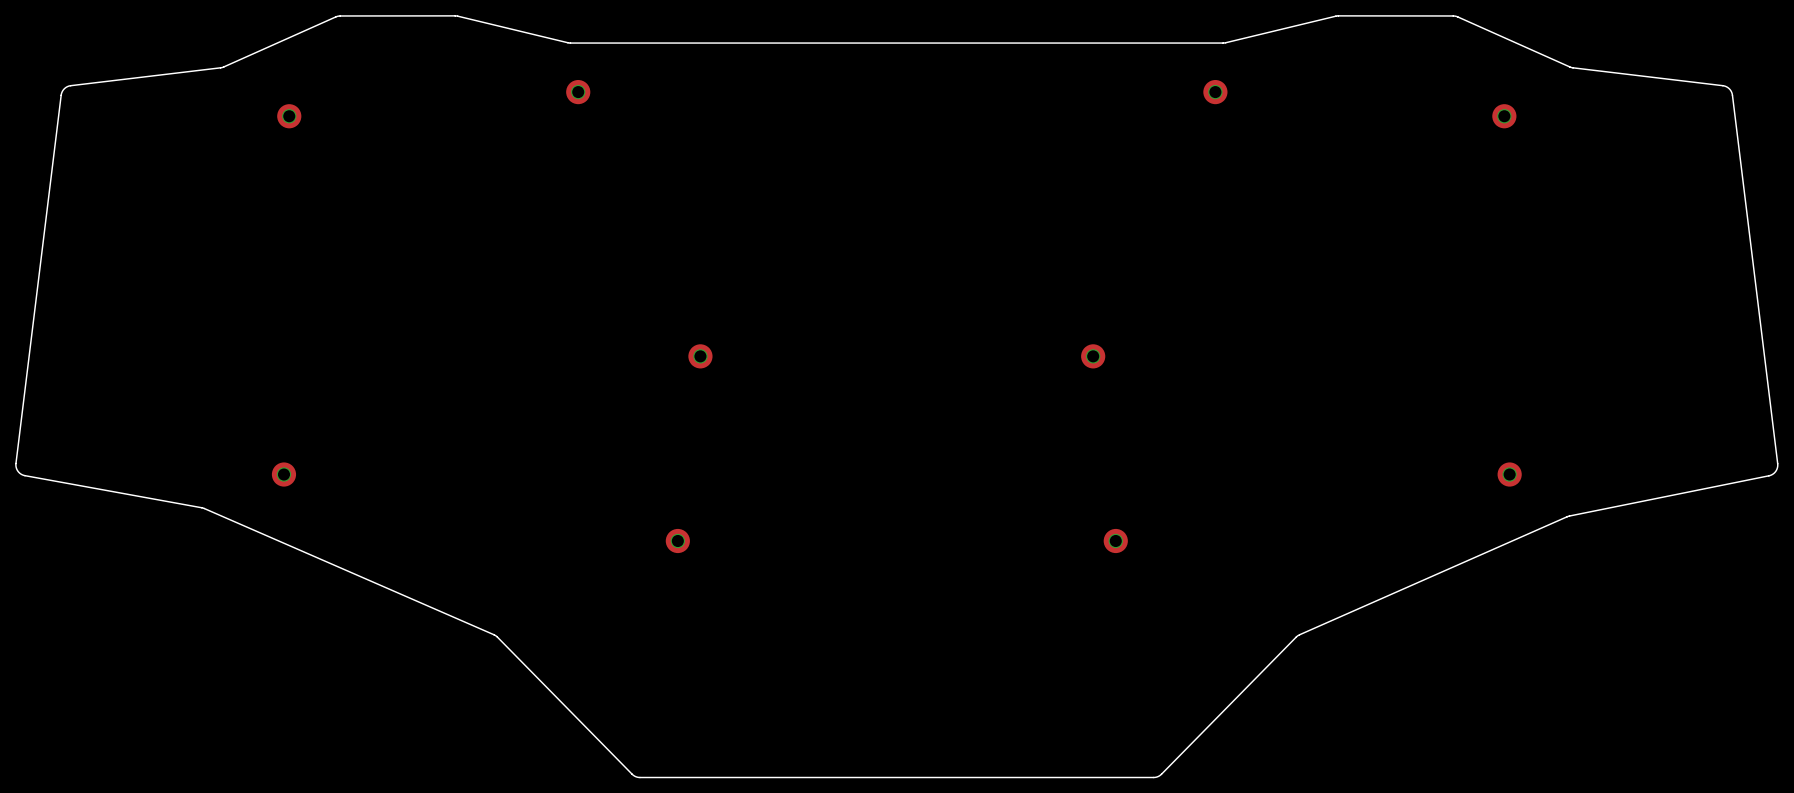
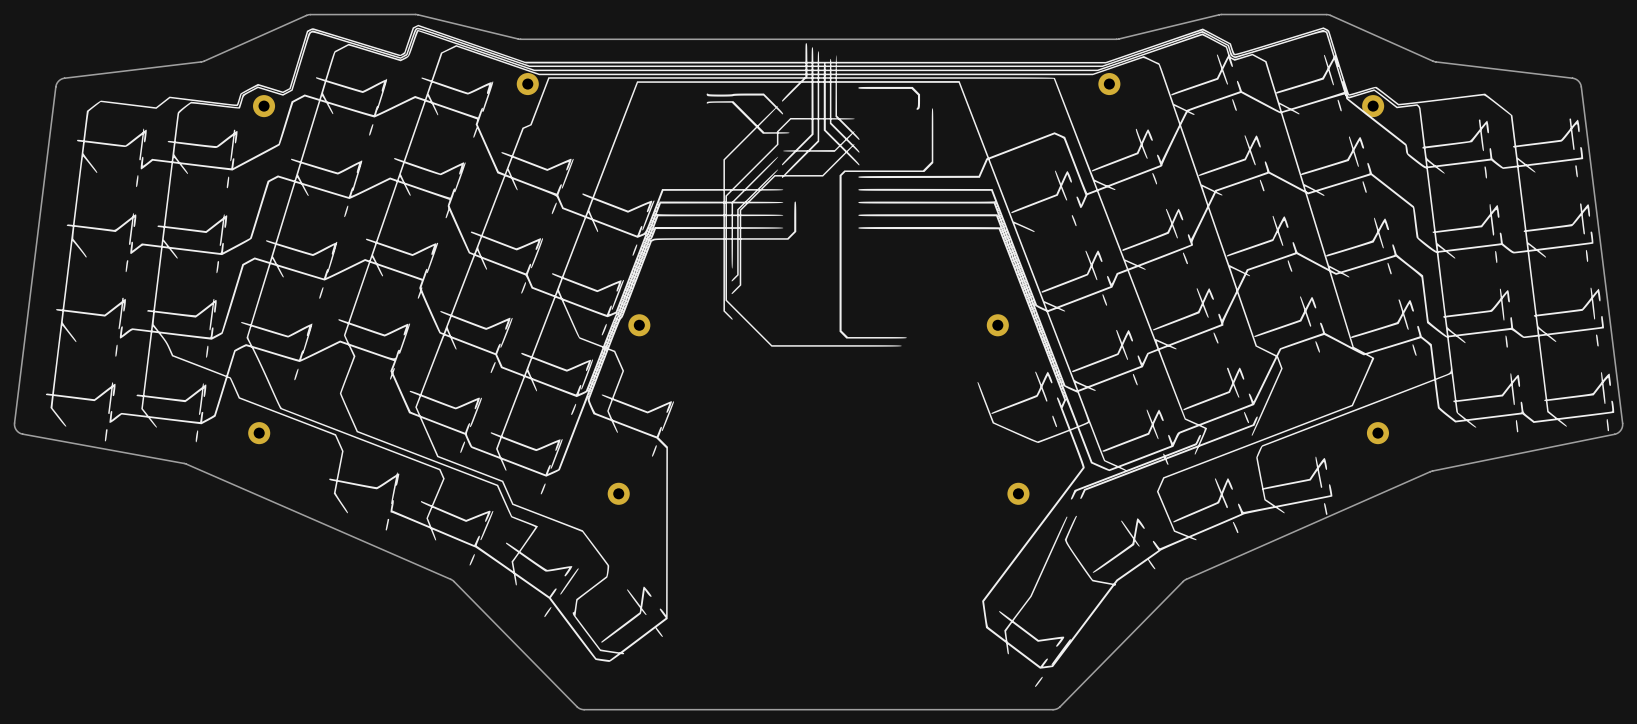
drawing: none -> [45, 24, 1615, 687]

